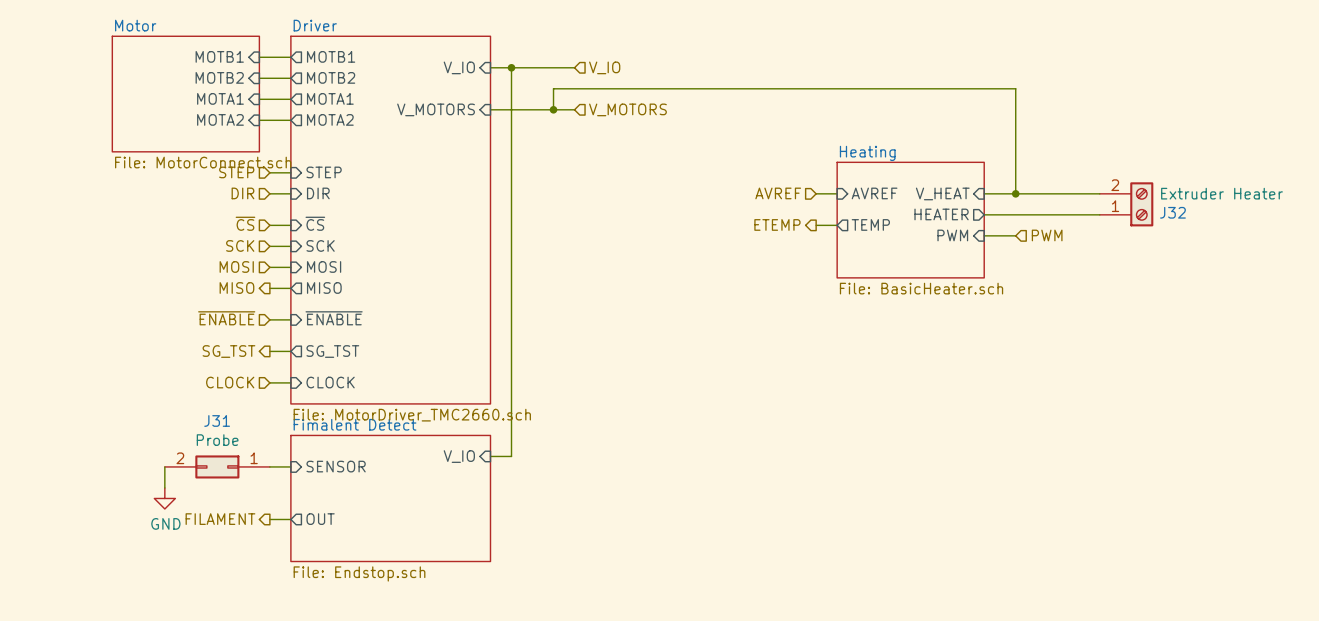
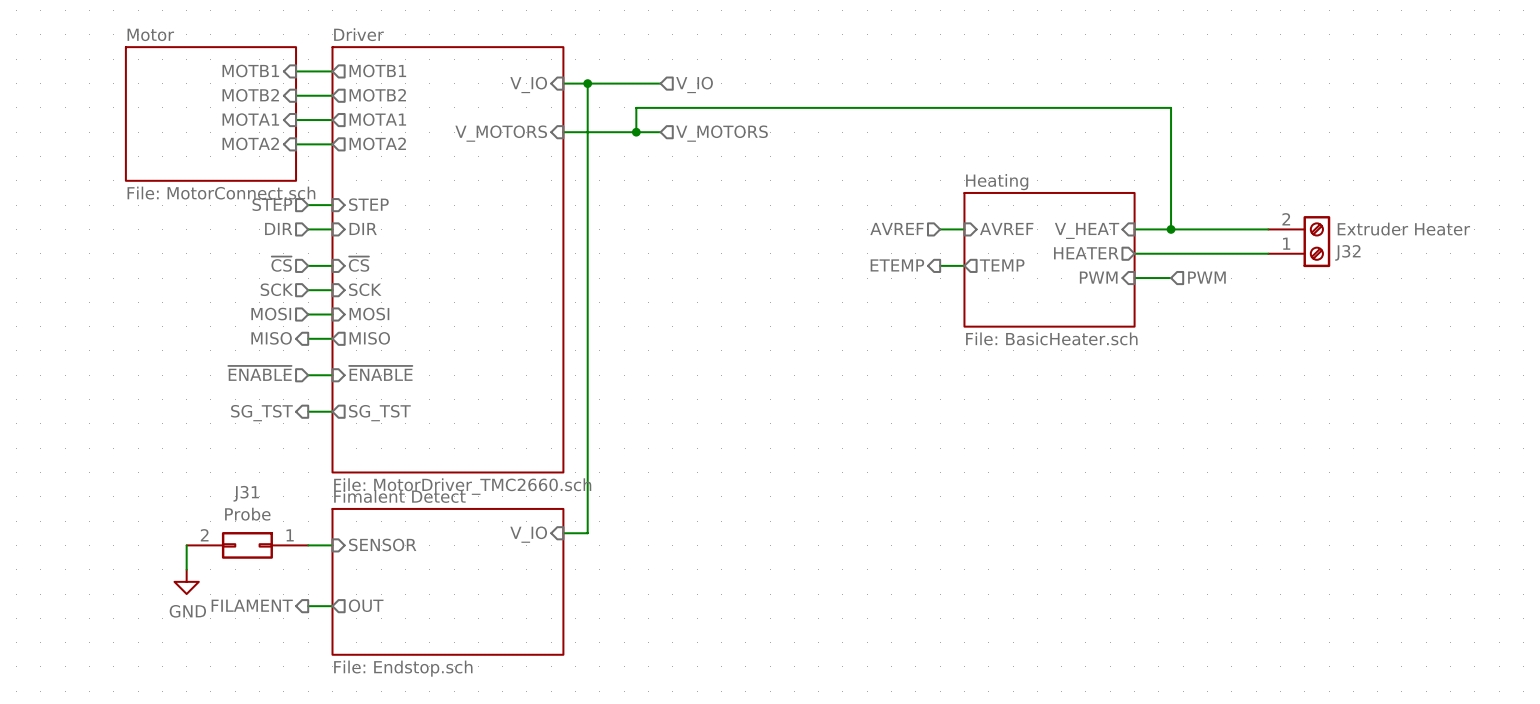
hierarchical label: CLOCK (230, 382) -> none
wire: (269, 382) (290, 382) -> none
sheet pin: CLOCK (330, 382) -> none

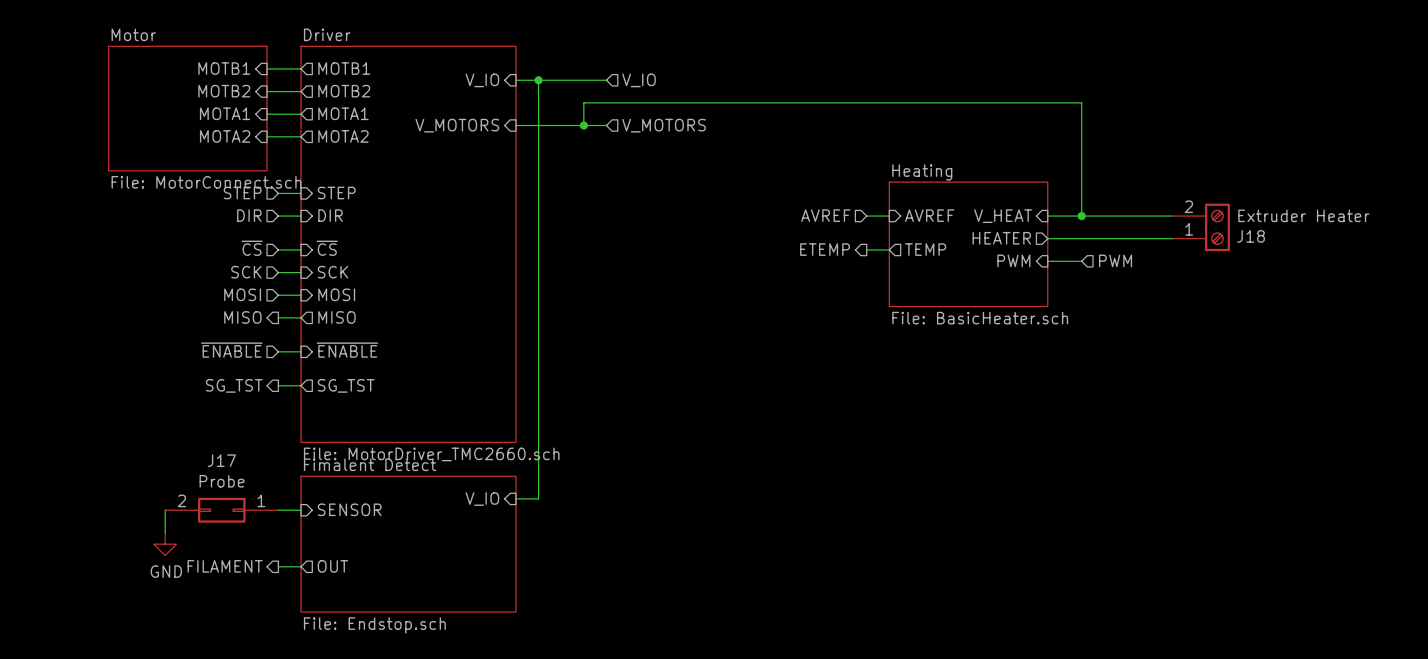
J32 name: J32 (1347, 252) -> J18 (1251, 236)
J31 name: J31 (246, 493) -> J17 (221, 460)

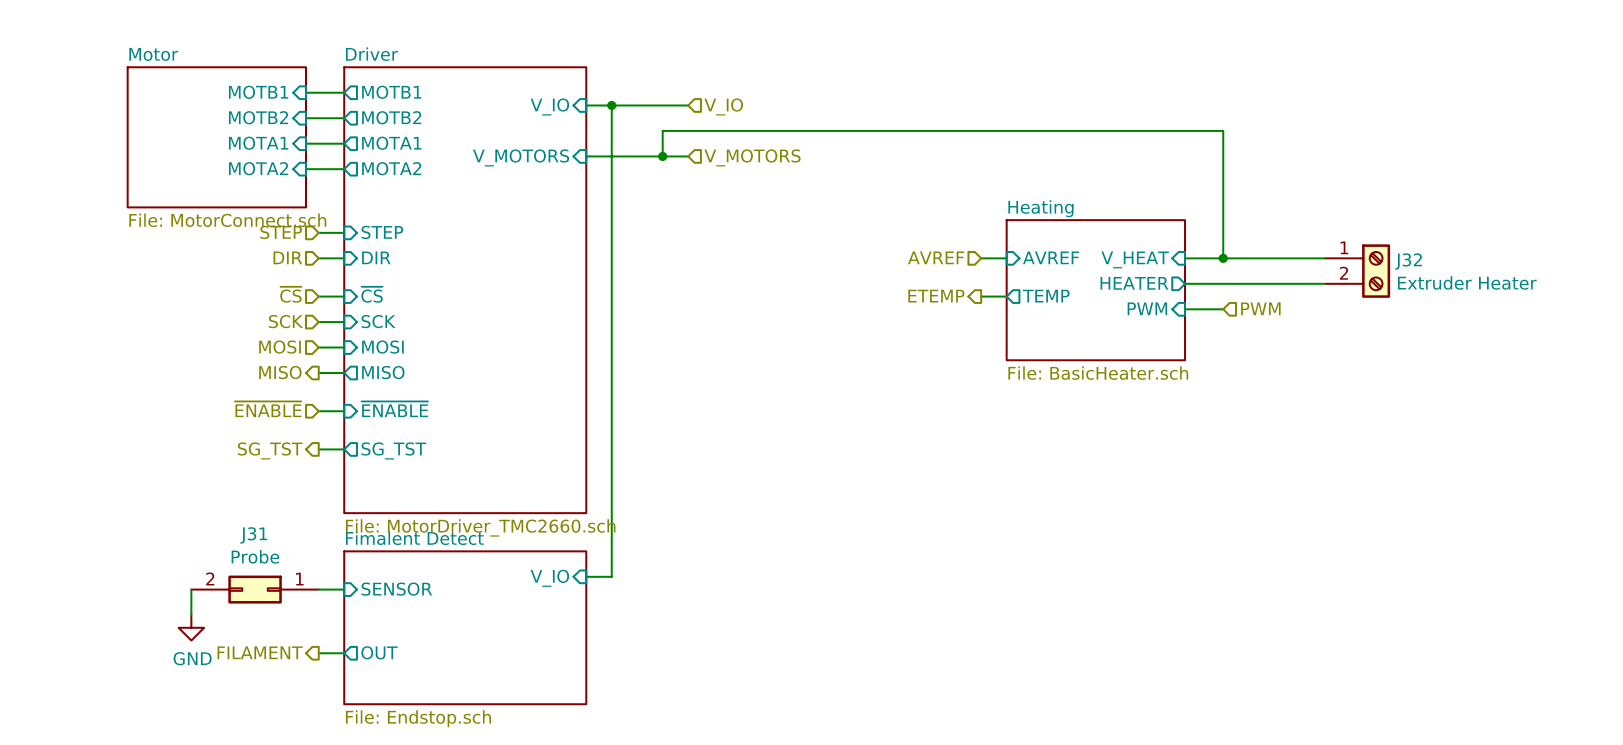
J18: Extruder Heater (1201, 227) -> none
J32: none -> Extruder Heater (1357, 271)
J17 name: J17 (221, 460) -> J31 (253, 535)

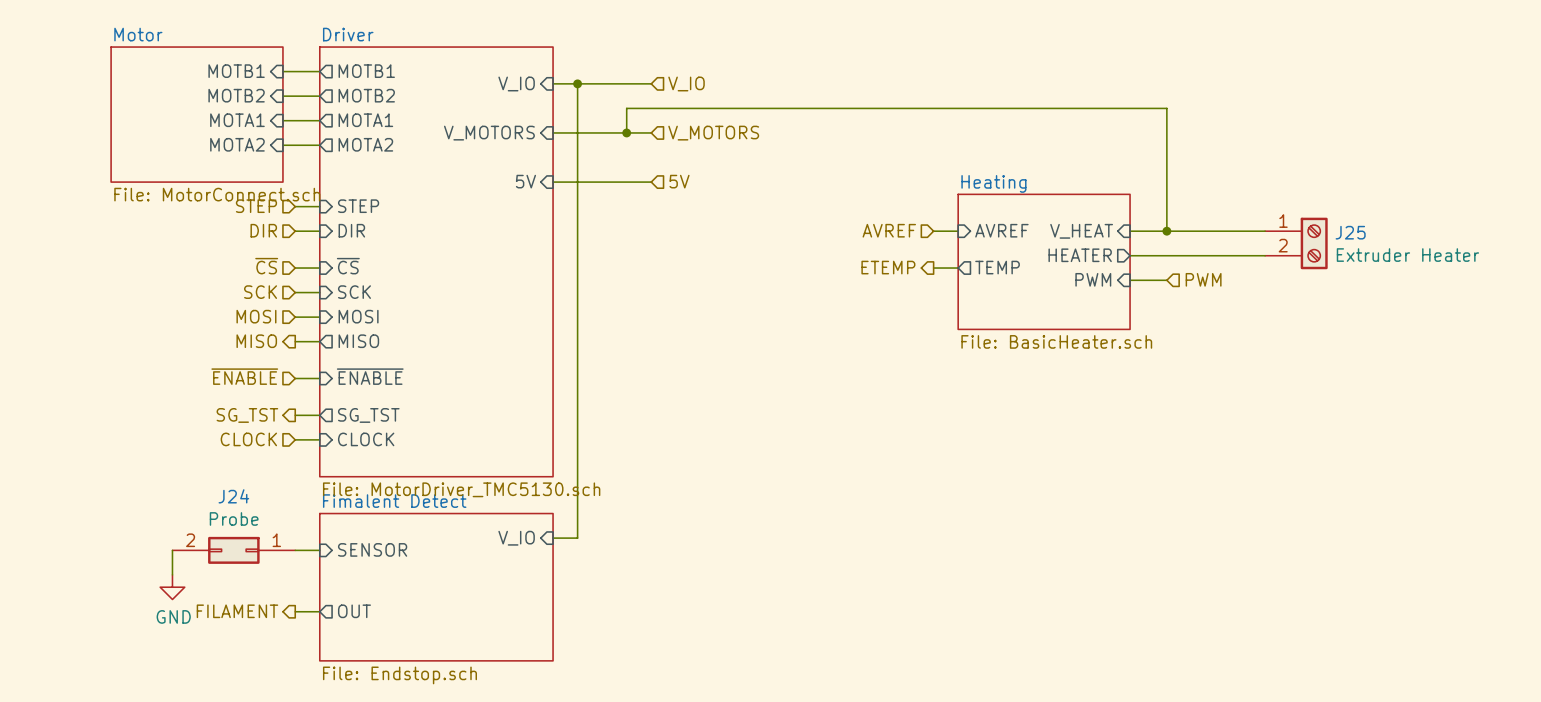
sheet pin: none -> 5V (525, 181)
wire: none -> (553, 182) (651, 182)
hierarchical label: none -> 5V (679, 181)
J32 name: J32 (1408, 261) -> J25 (1350, 232)
hierarchical label: none -> CLOCK (248, 439)
wire: none -> (295, 439) (319, 439)
sheet pin: none -> CLOCK (366, 439)
sheet Driver value: File: MotorDriver_TMC2660.sch (480, 527) -> File: MotorDriver_TMC5130.sch (461, 489)
J31 name: J31 (253, 535) -> J24 (233, 496)

